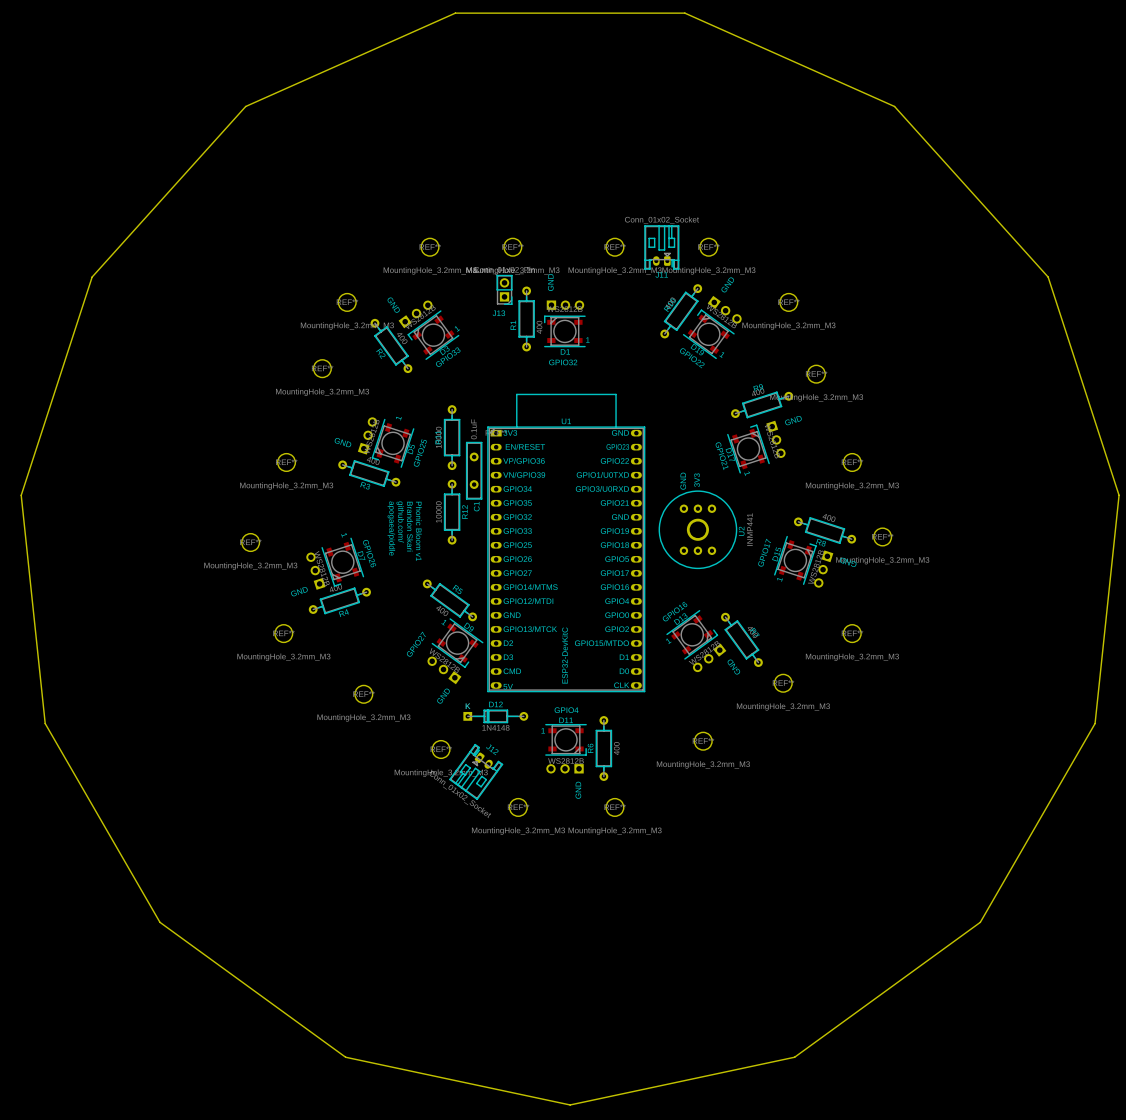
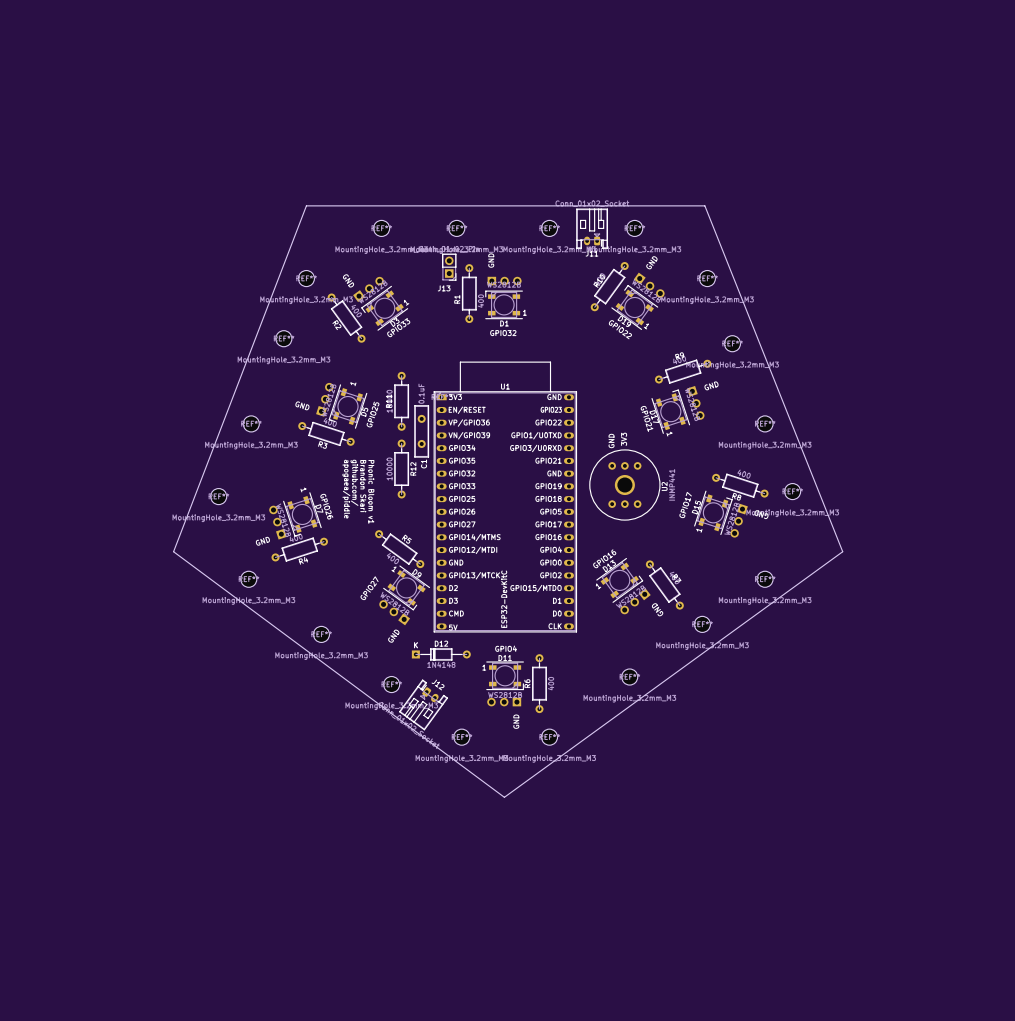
board edge: (455, 13) (684, 13) (894, 106) (1048, 277) (1119, 495) (1095, 723) (980, 922) (794, 1057) (570, 1104) (345, 1057) (159, 922) (45, 723) (21, 495) (92, 277) (245, 106) (455, 13) -> none
board edge: none -> (306, 205) (173, 551) (504, 797) (842, 551) (704, 205) (306, 205)

